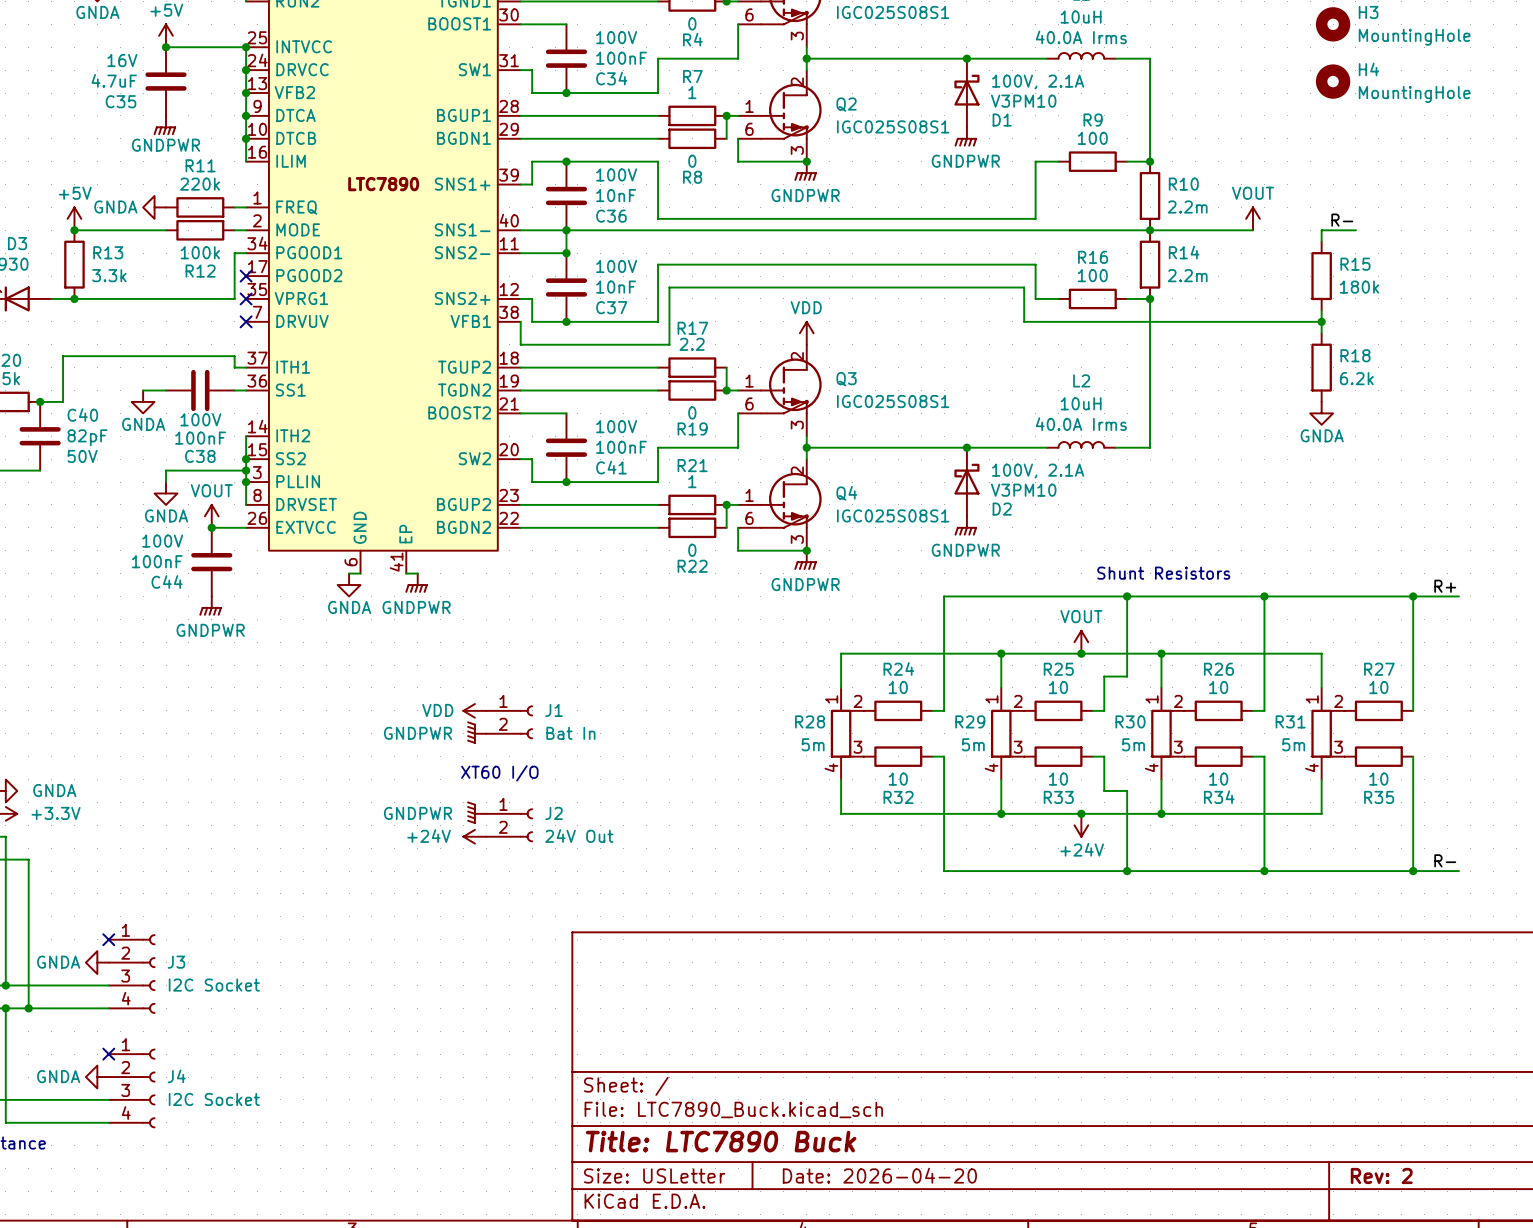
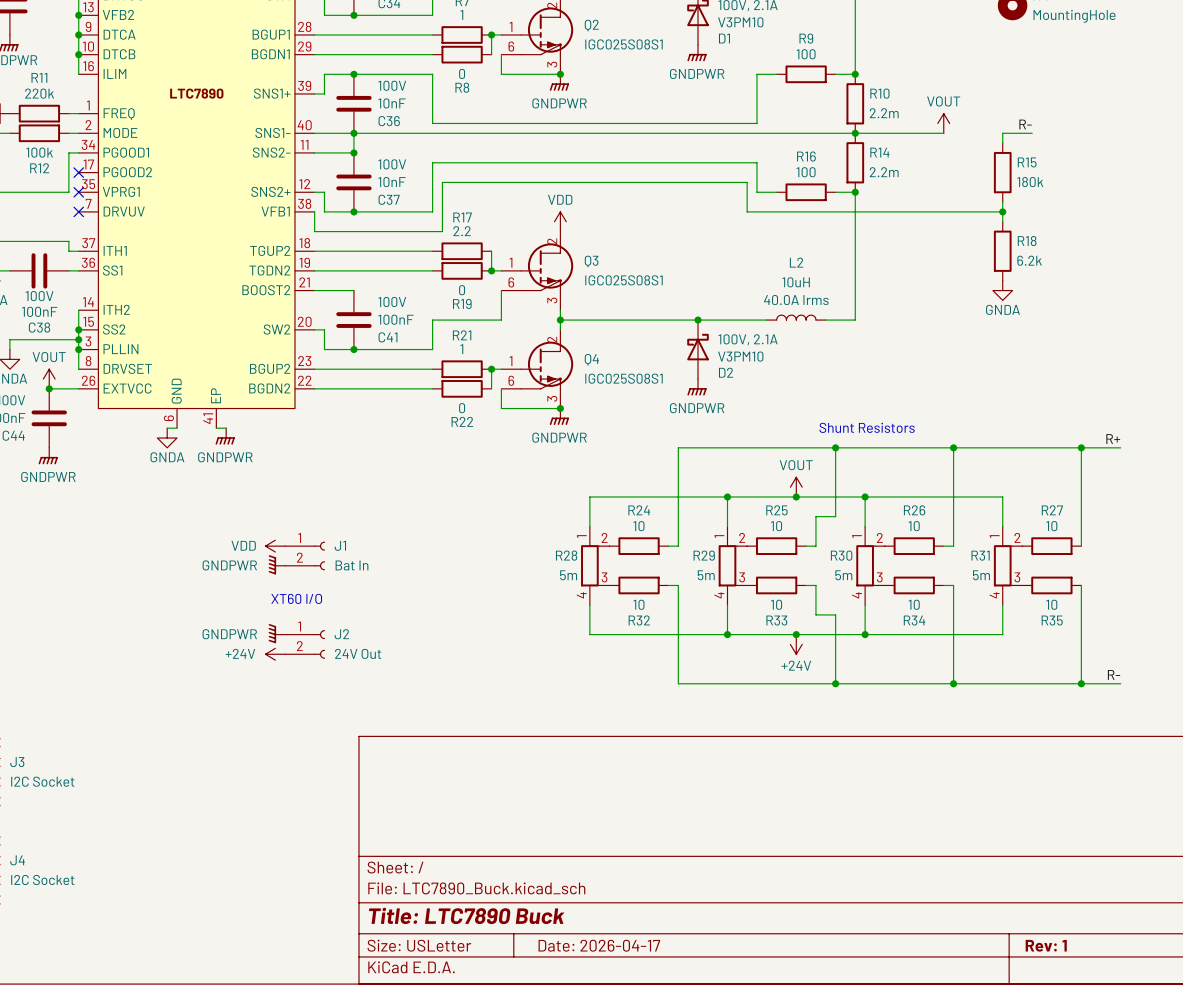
title block: Date: 2026-04-20 (879, 1175) -> Date: 2026-04-17 (599, 945)
title block: Rev: 2 (1381, 1175) -> Rev: 1 (1046, 945)

